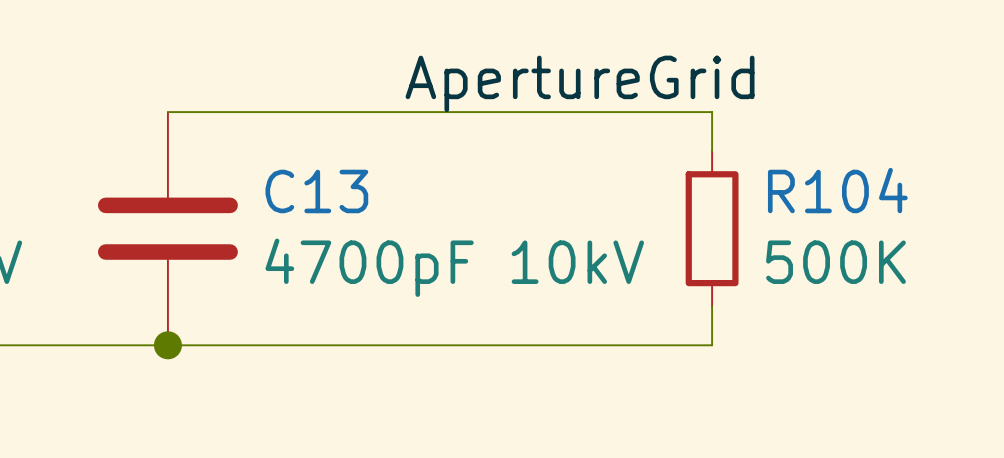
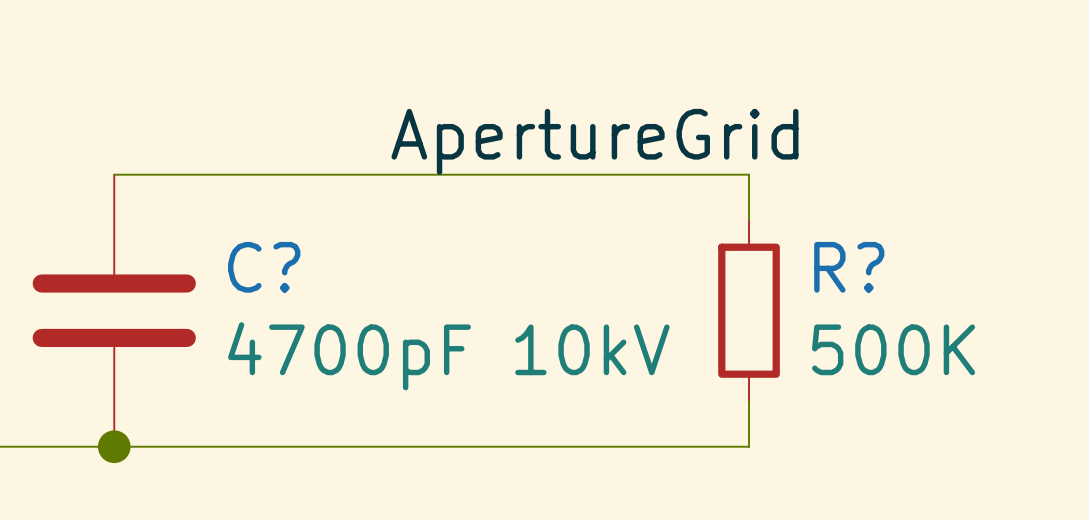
R104 name: R104 (837, 190) -> R? (849, 267)
C13 name: C13 (316, 191) -> C? (264, 267)

